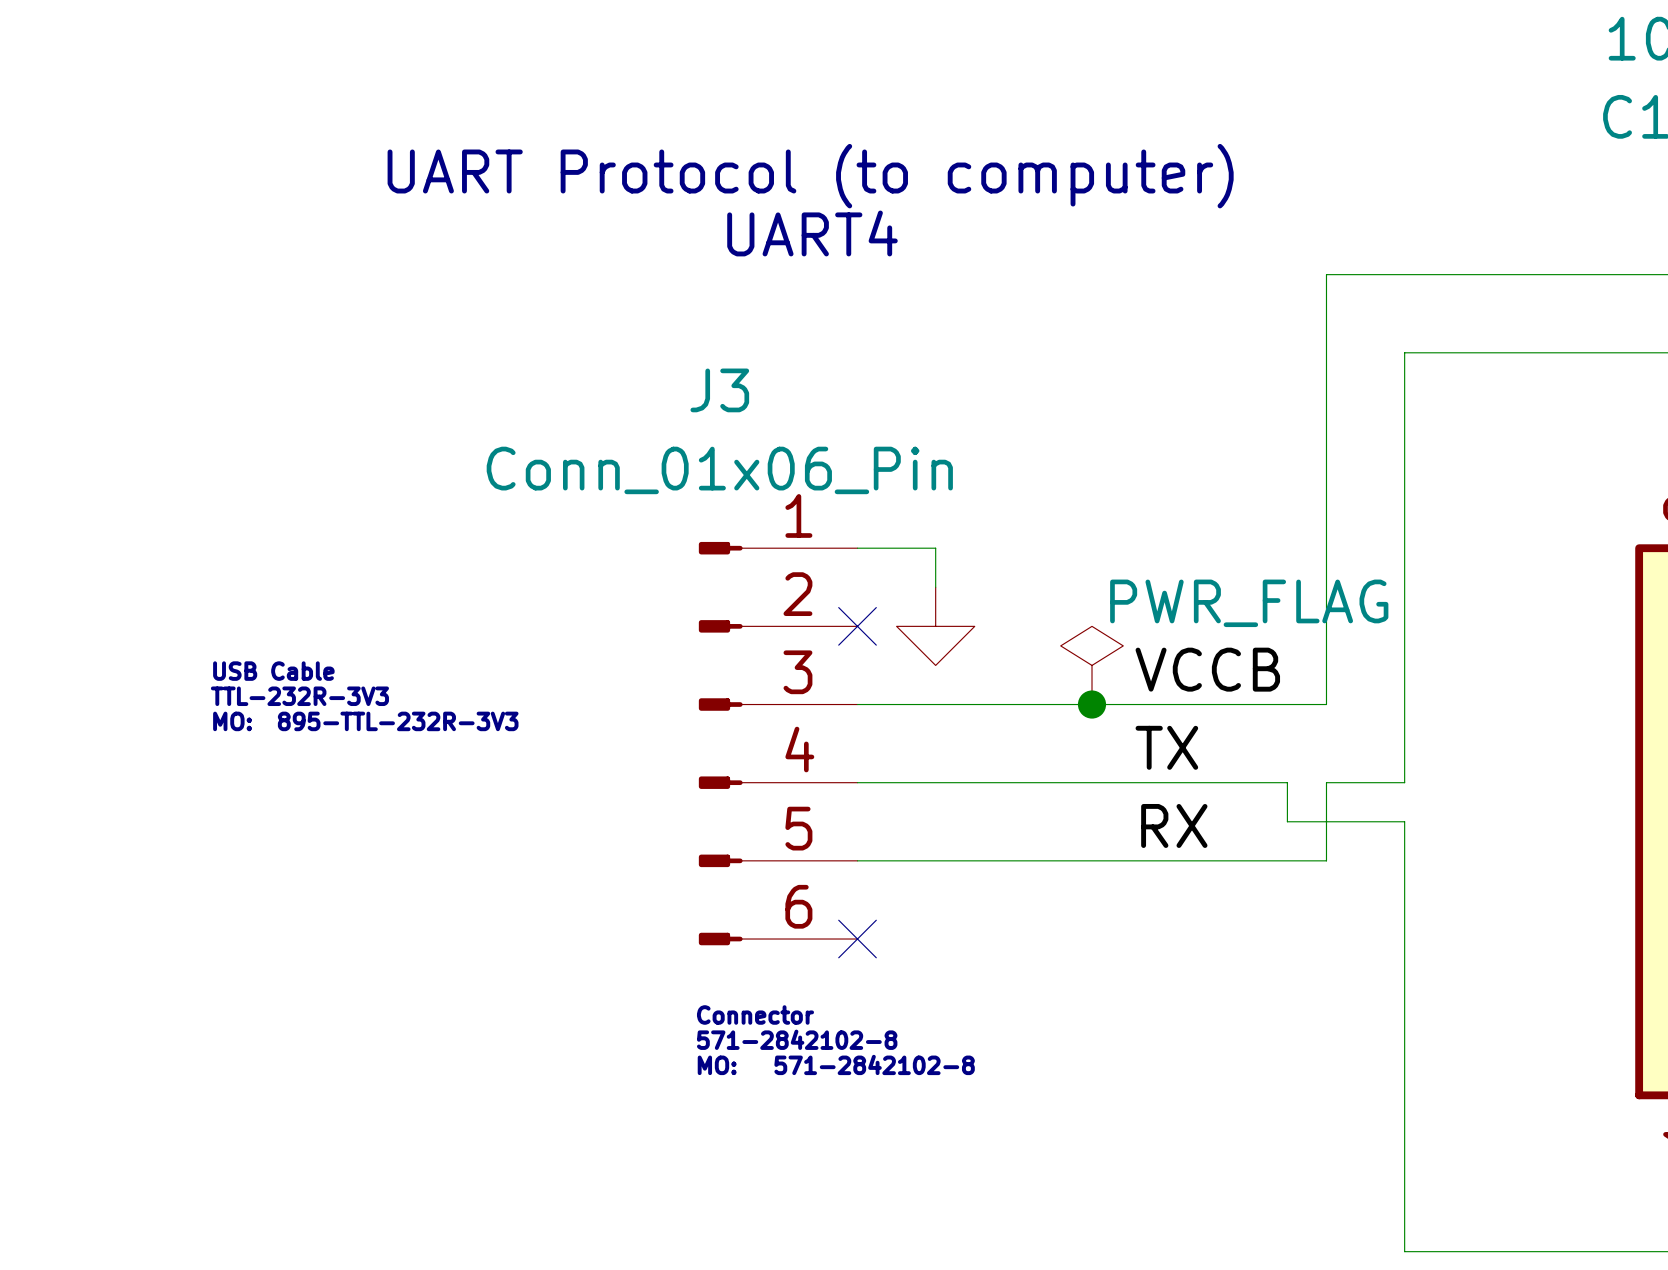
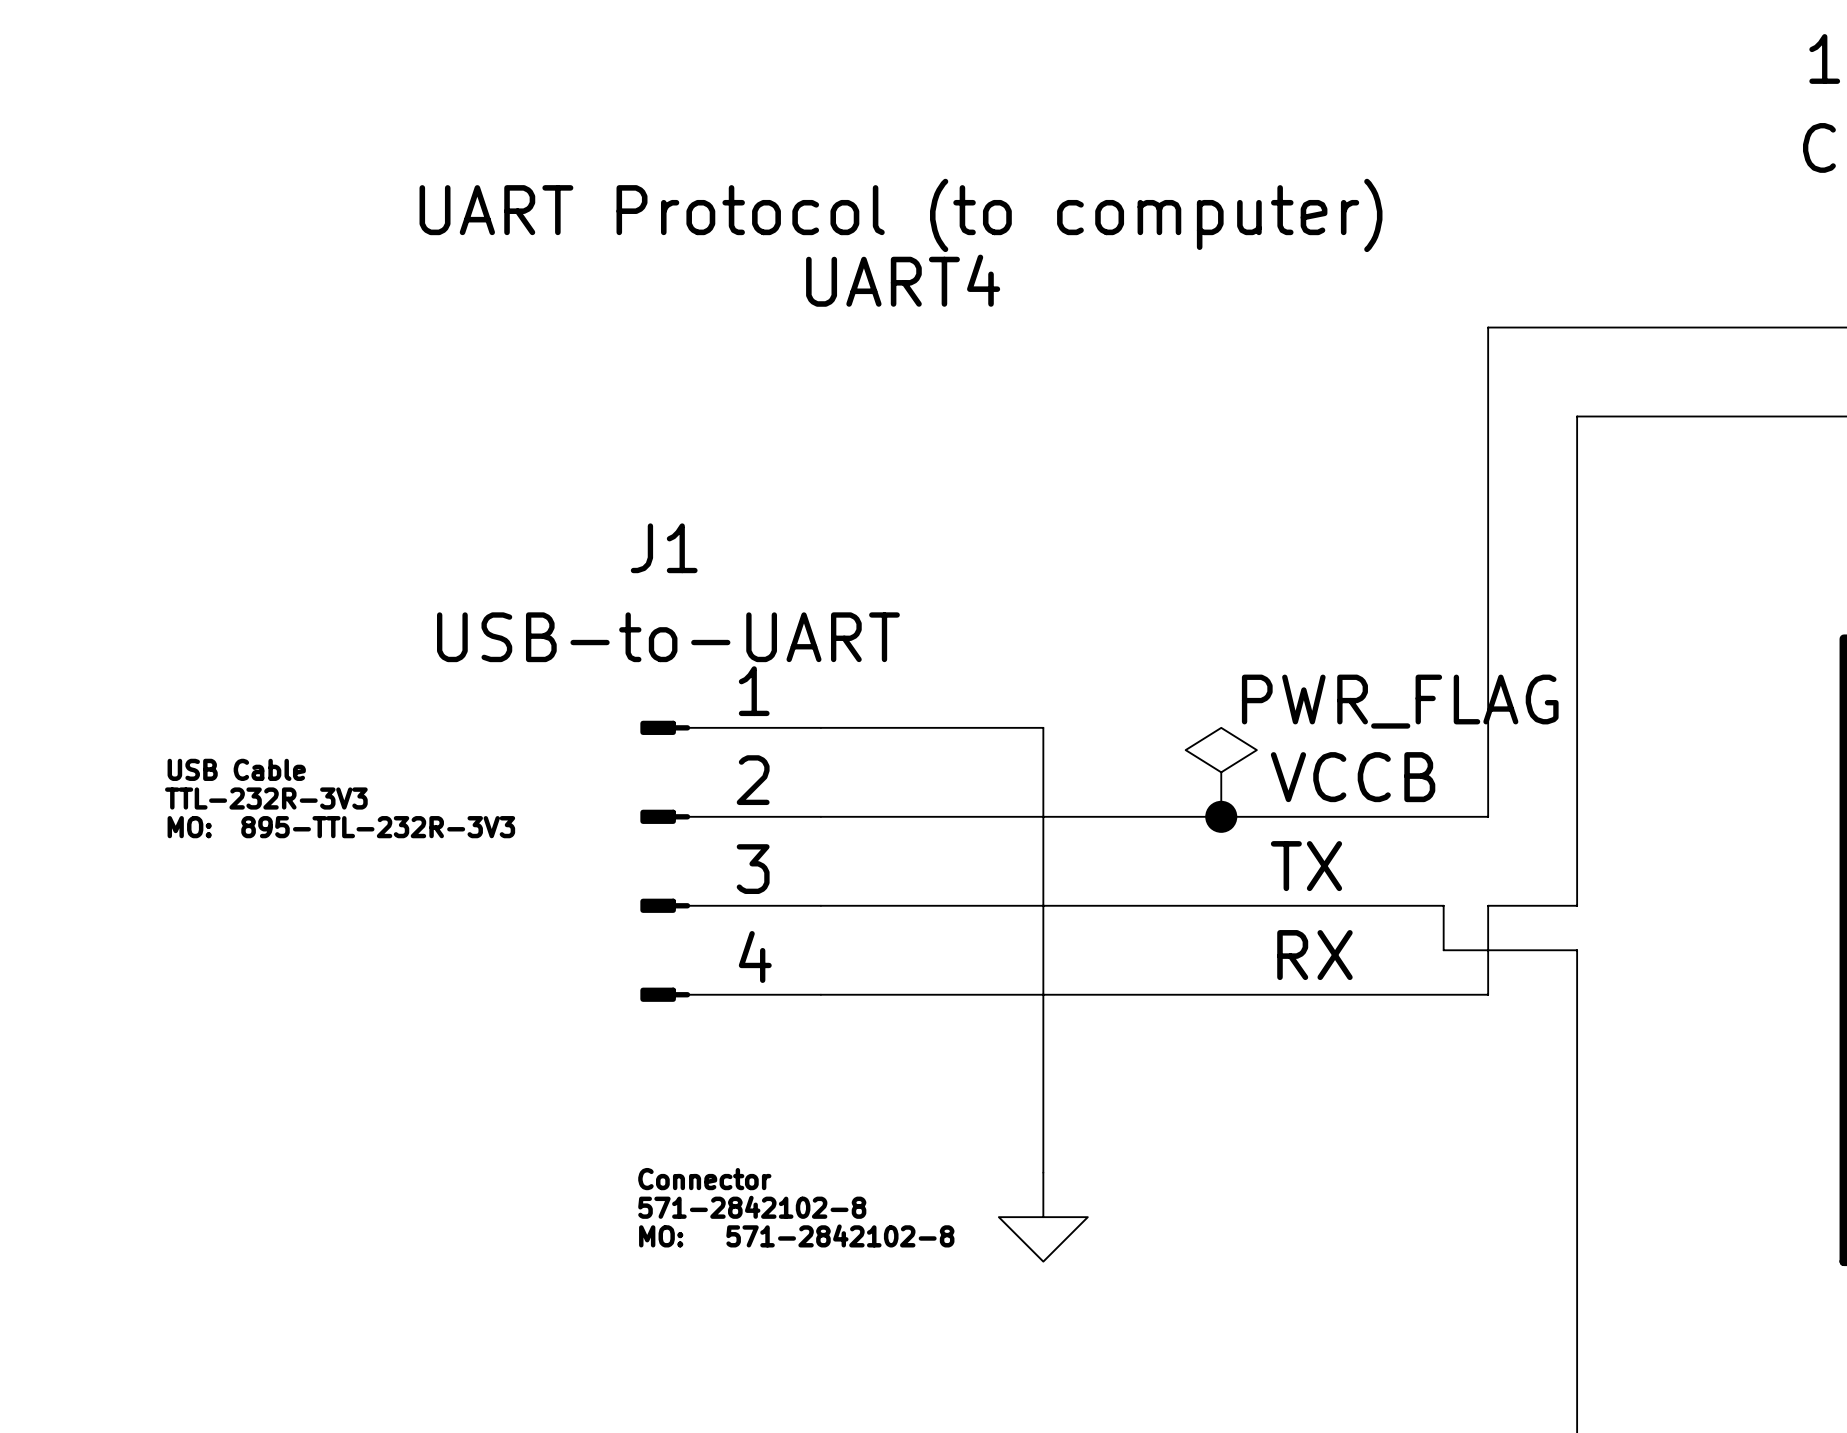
wire: (857, 548) (935, 548) (935, 587) -> none
wire: none -> (820, 727) (1043, 727) (1043, 1172)
no-connect mark: (857, 626) -> none
power symbol position: (935, 626) -> (1043, 1217)
text position: USB Cable (273, 671) -> USB Cable (236, 769)
text position: TTL-232R-3V3 (299, 696) -> TTL-232R-3V3 (266, 798)
text position: MO: 895-TTL-232R-3V3 (365, 721) -> MO: 895-TTL-232R-3V3 (341, 827)
J1: none -> USB-to-UART (730, 861)
J3: Conn_01x06_Pin (778, 743) -> none
no-connect mark: (857, 939) -> none
text position: Connector (755, 1014) -> Connector (704, 1179)
text position: 571-2842102-8 (797, 1039) -> 571-2842102-8 (752, 1207)
text position: MO: 571-2842102-8 (836, 1064) -> MO: 571-2842102-8 (796, 1235)

